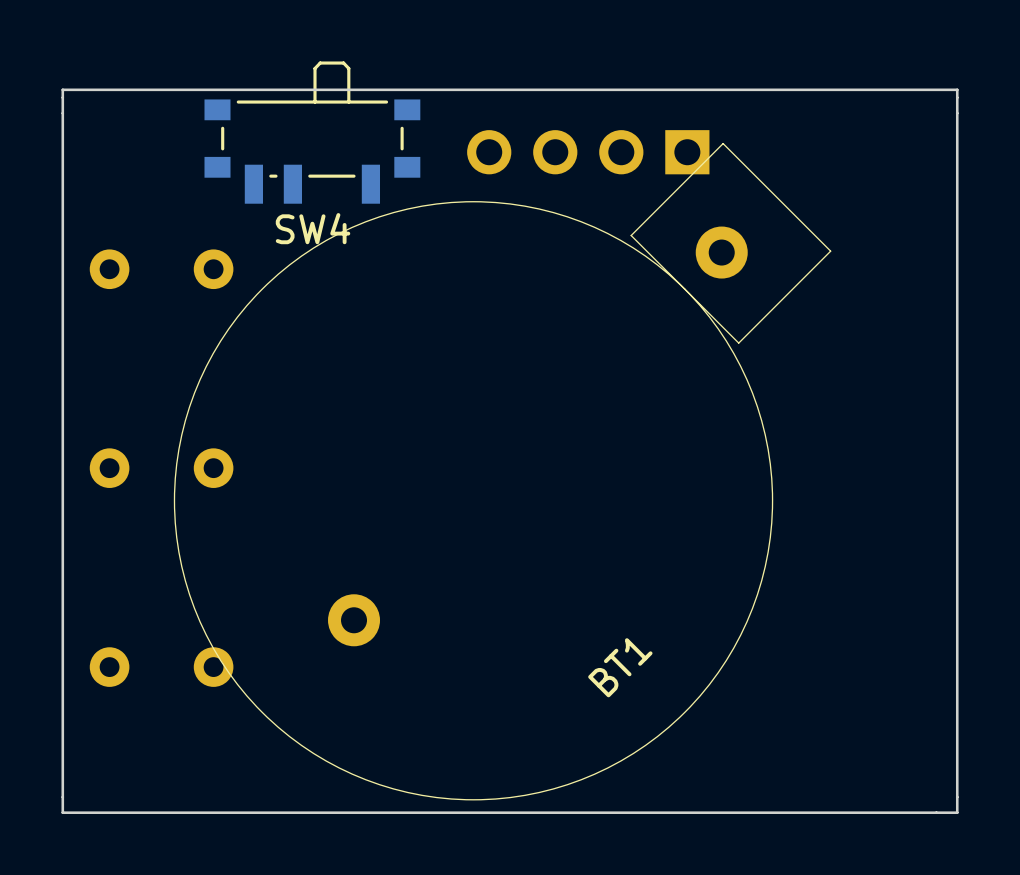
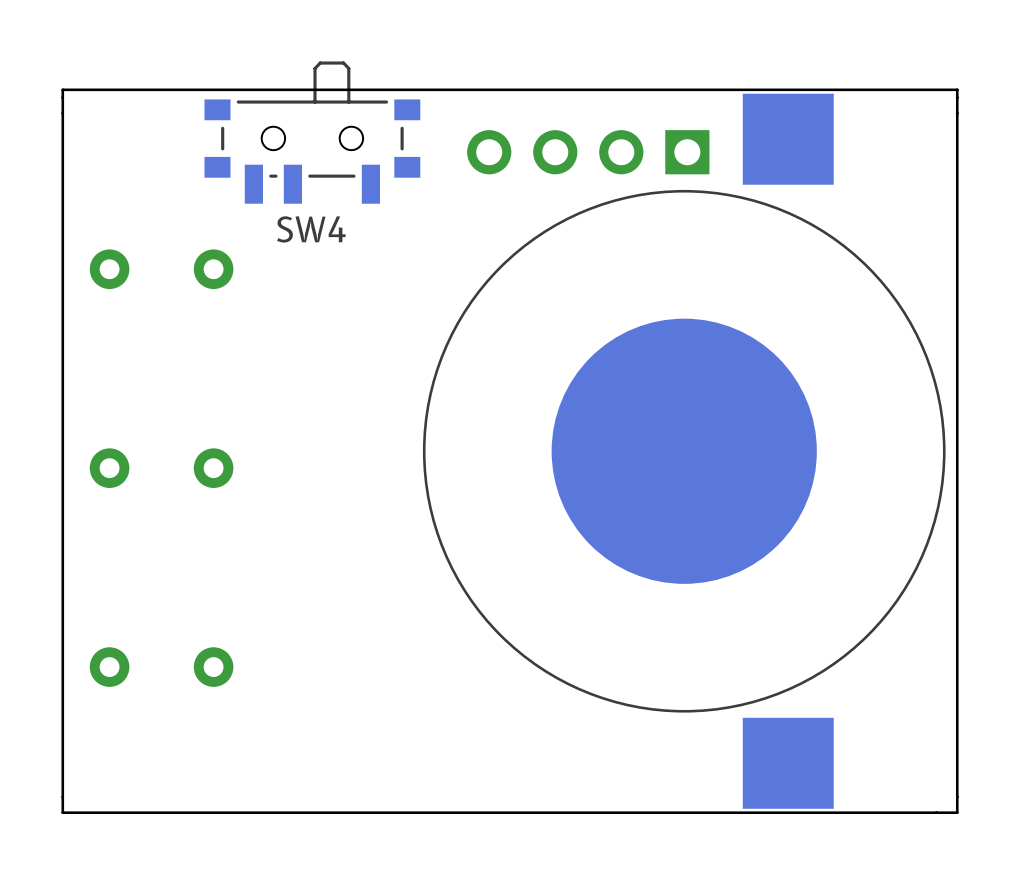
SW4 footprint: [204, 61, 421, 204] -> [204, 61, 421, 204]
part: none -> (684, 451)
BT1: (502, 471) -> none

